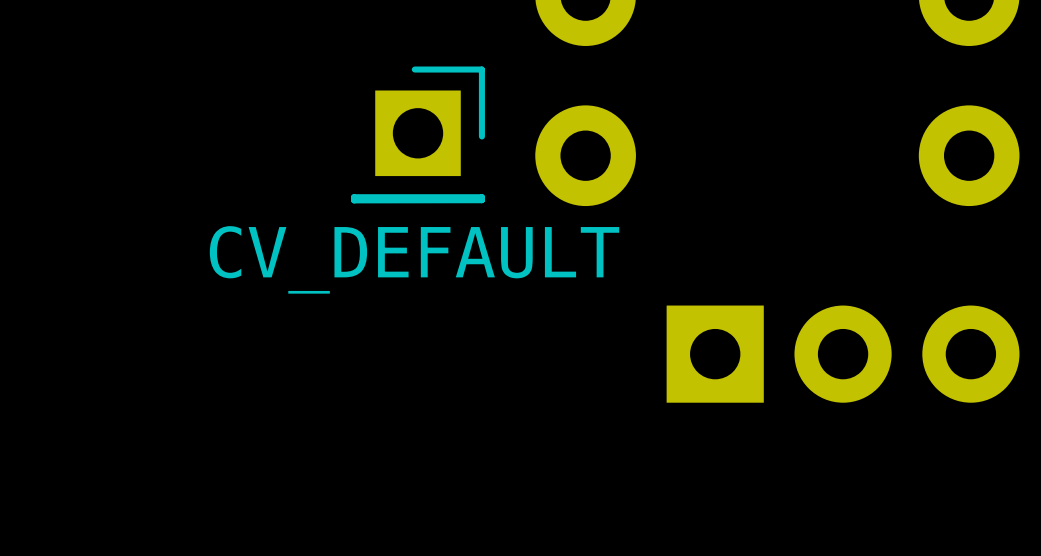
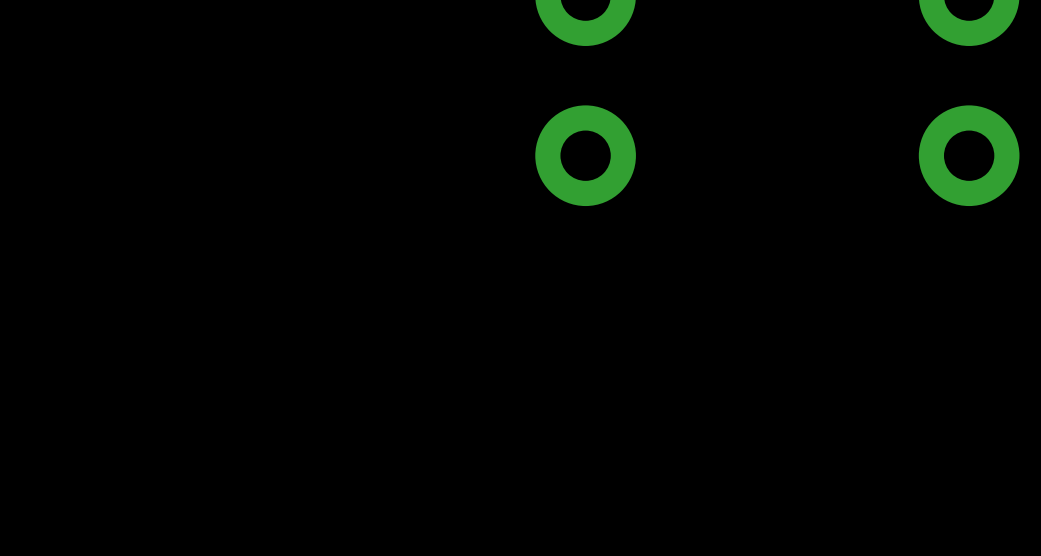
part: CV_DEFAULT (418, 134) -> none
part: (843, 354) -> none

